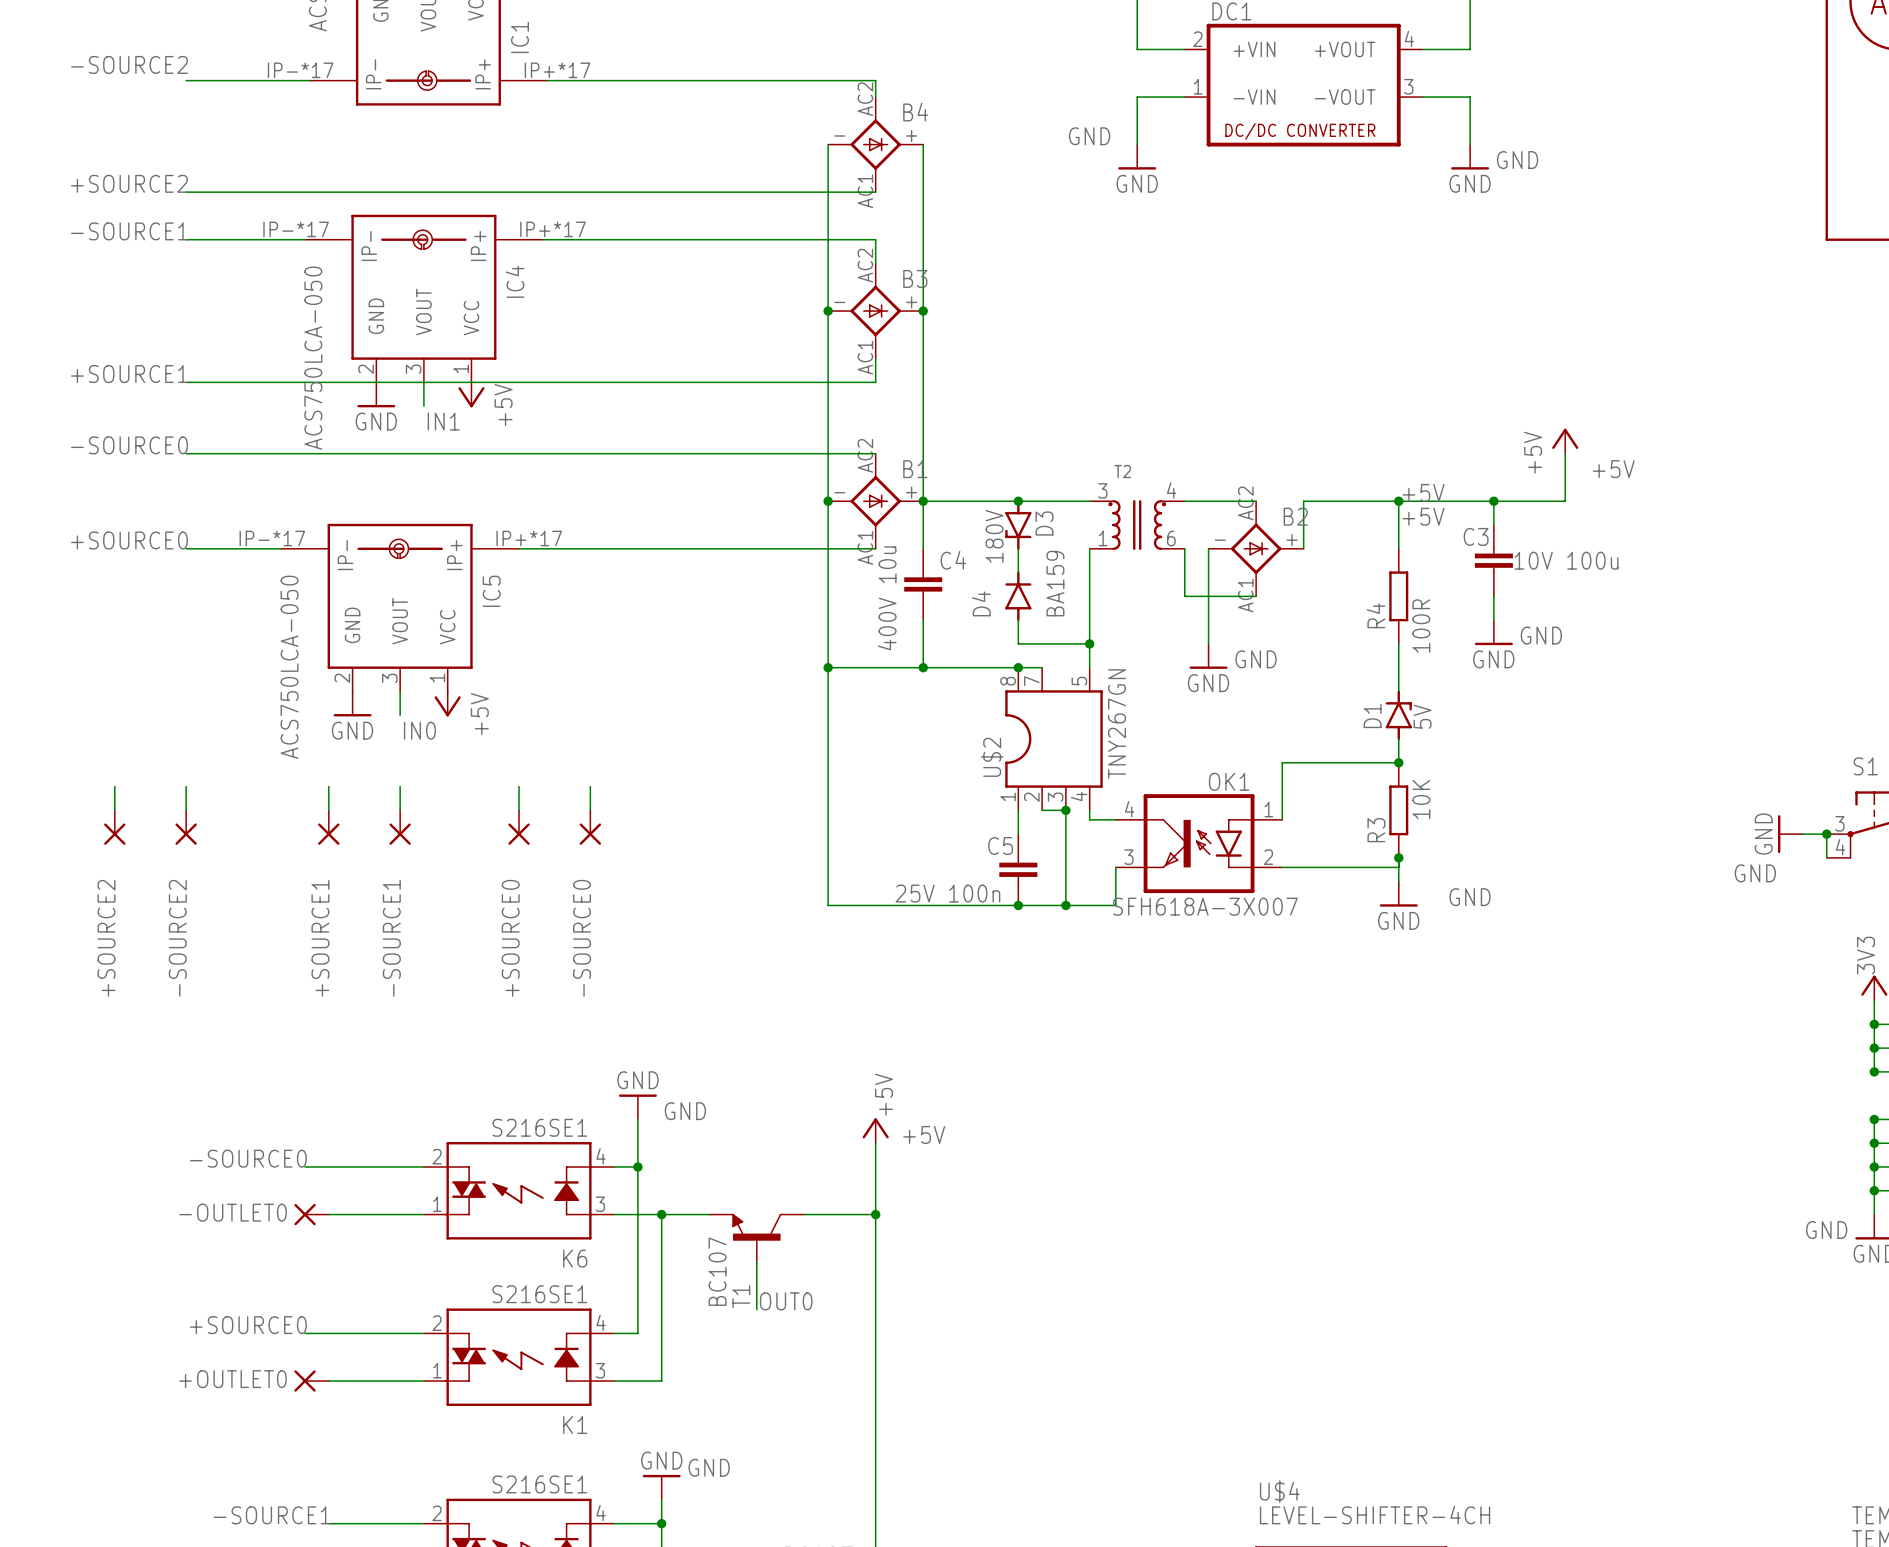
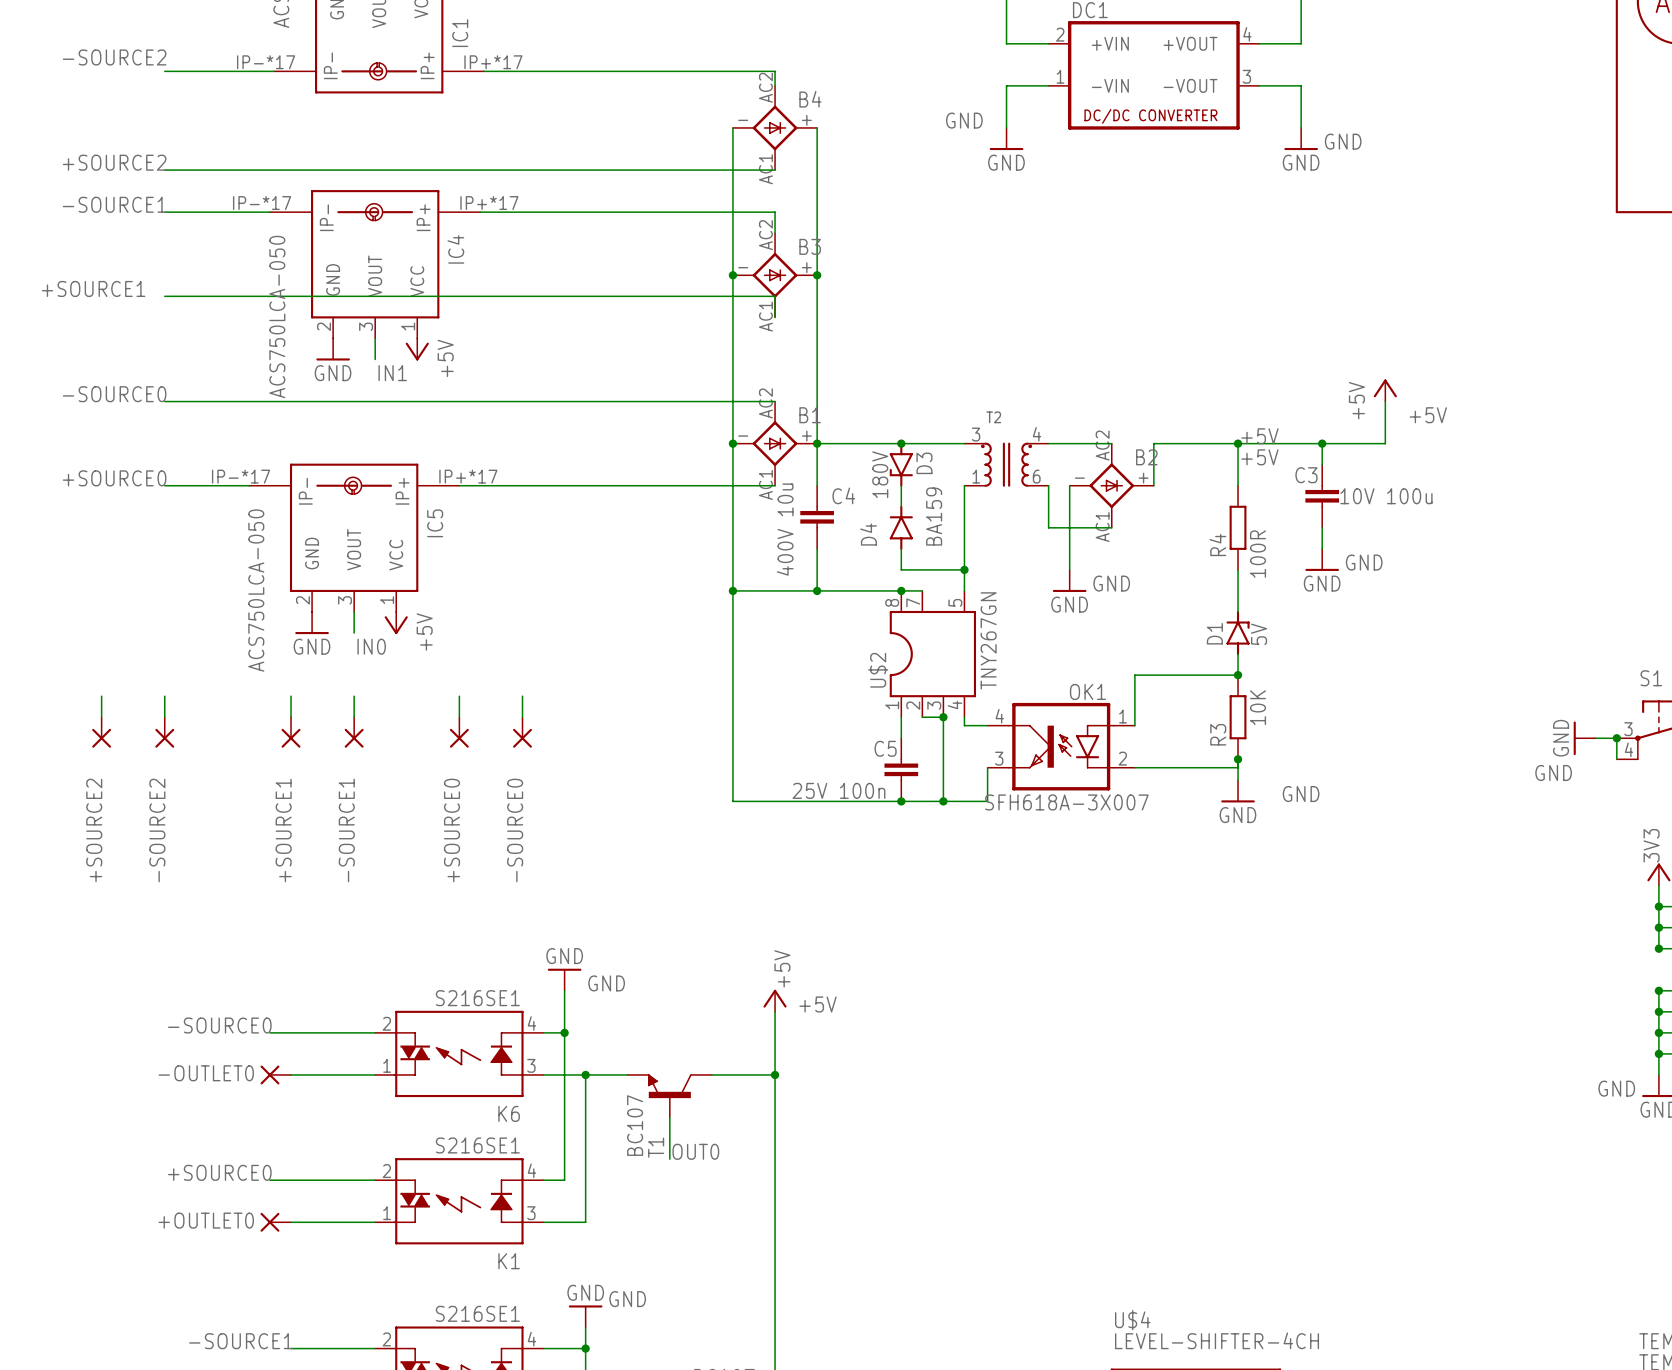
wire: (875, 358) (875, 382) (186, 382) -> (775, 317) (775, 296) (164, 296)
label position: +SOURCE1 (129, 374) -> +SOURCE1 (93, 288)

